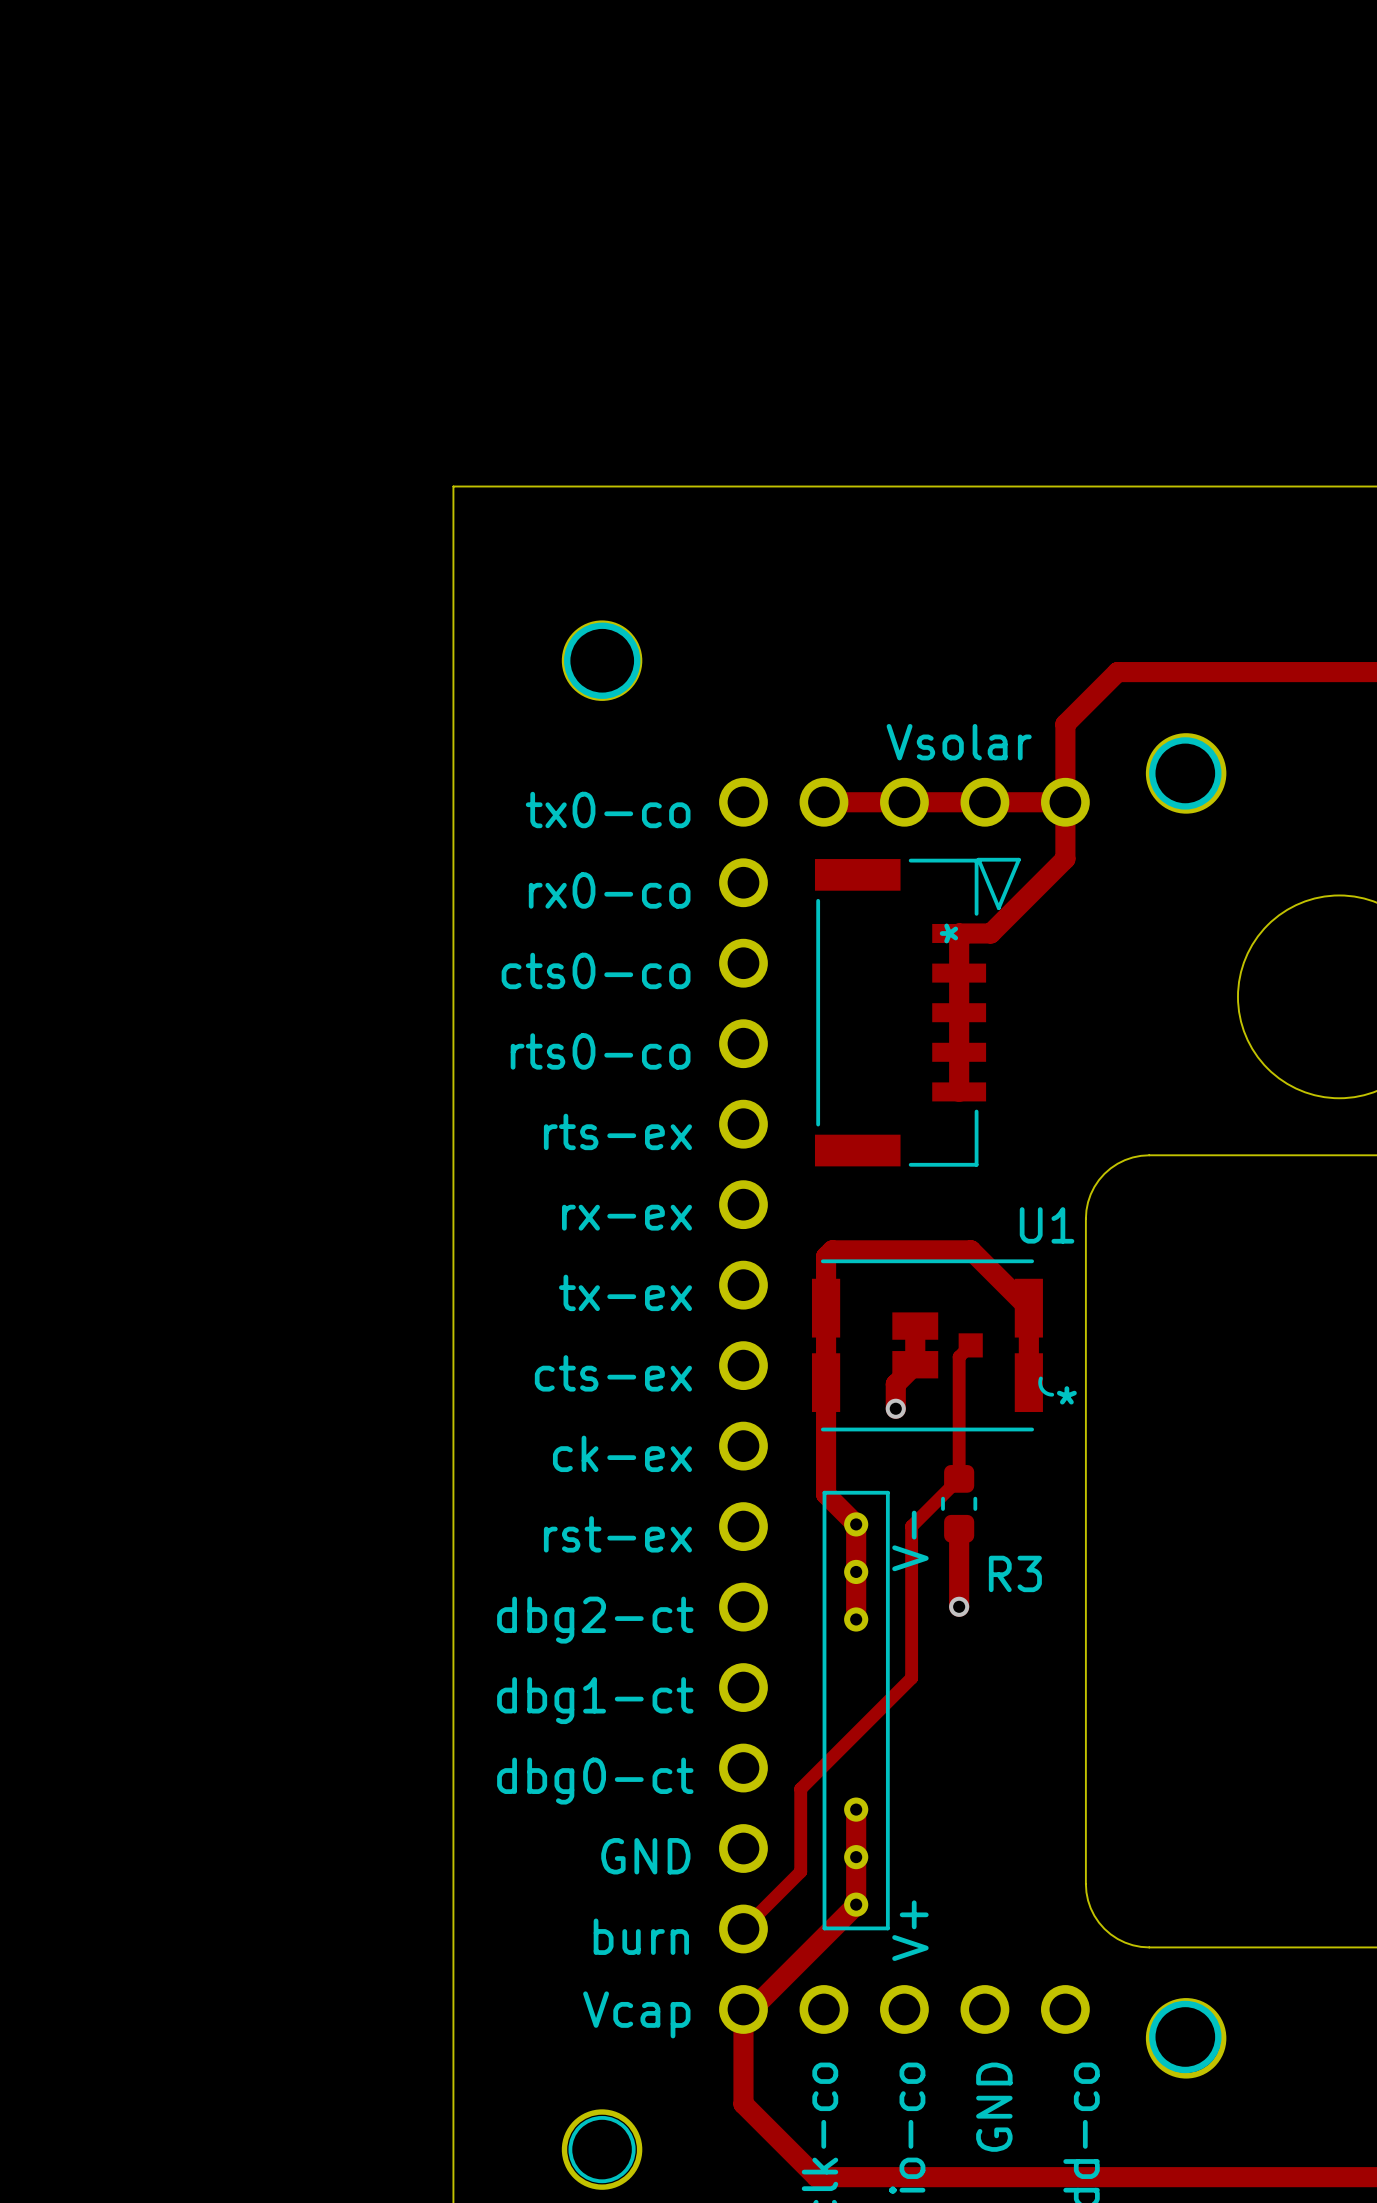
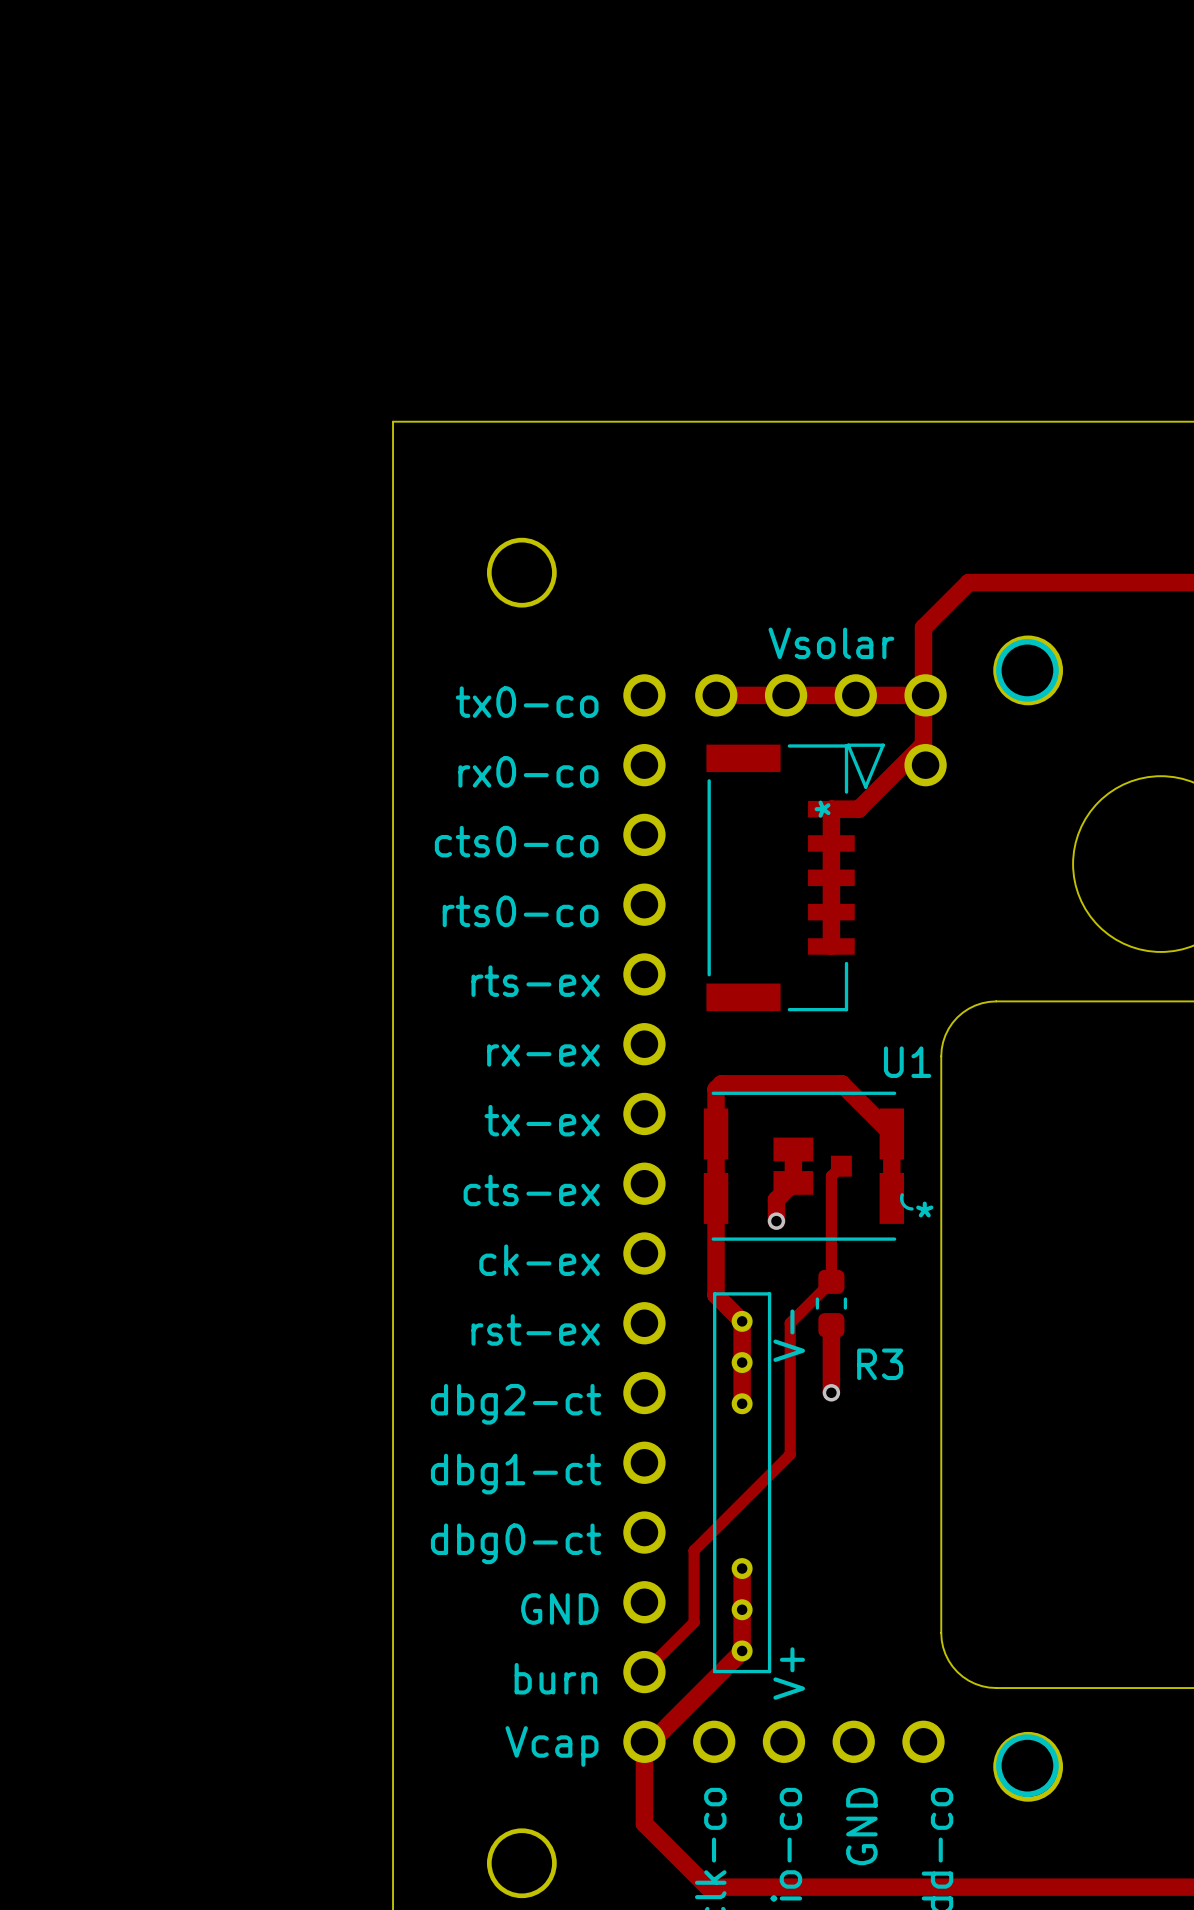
drawing: [564, 622, 641, 699] -> none
part: (944, 802) -> none
part: none -> (820, 730)
drawing: [568, 2115, 636, 2184] -> none

